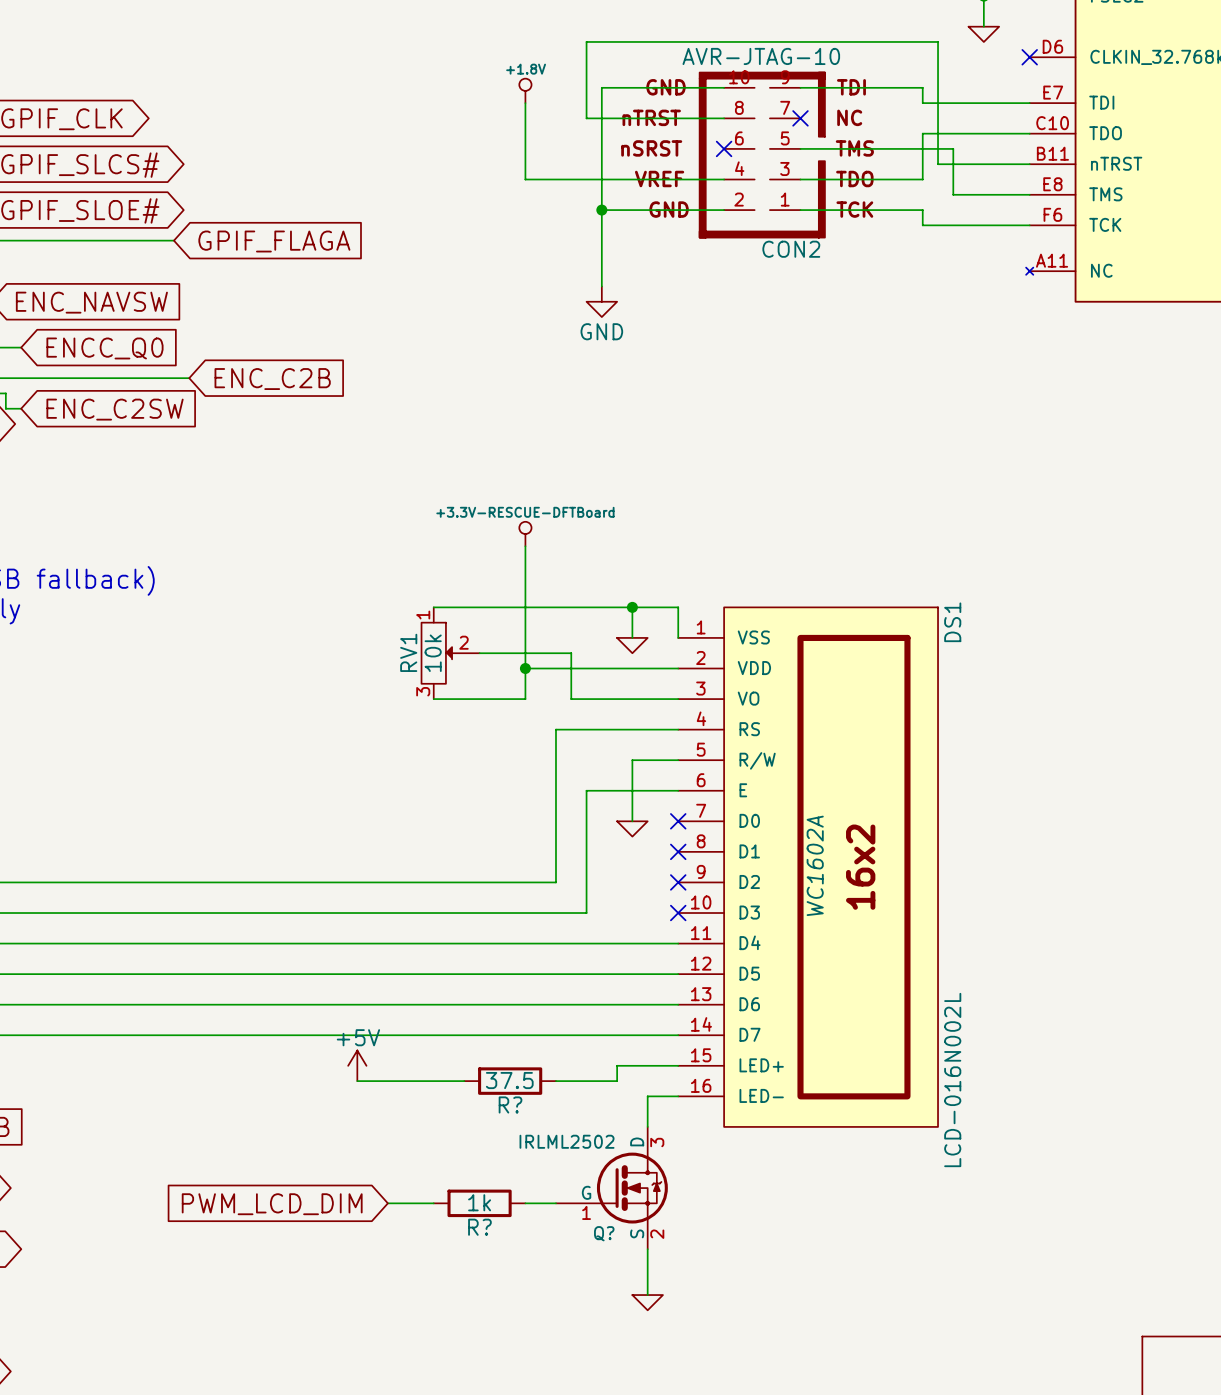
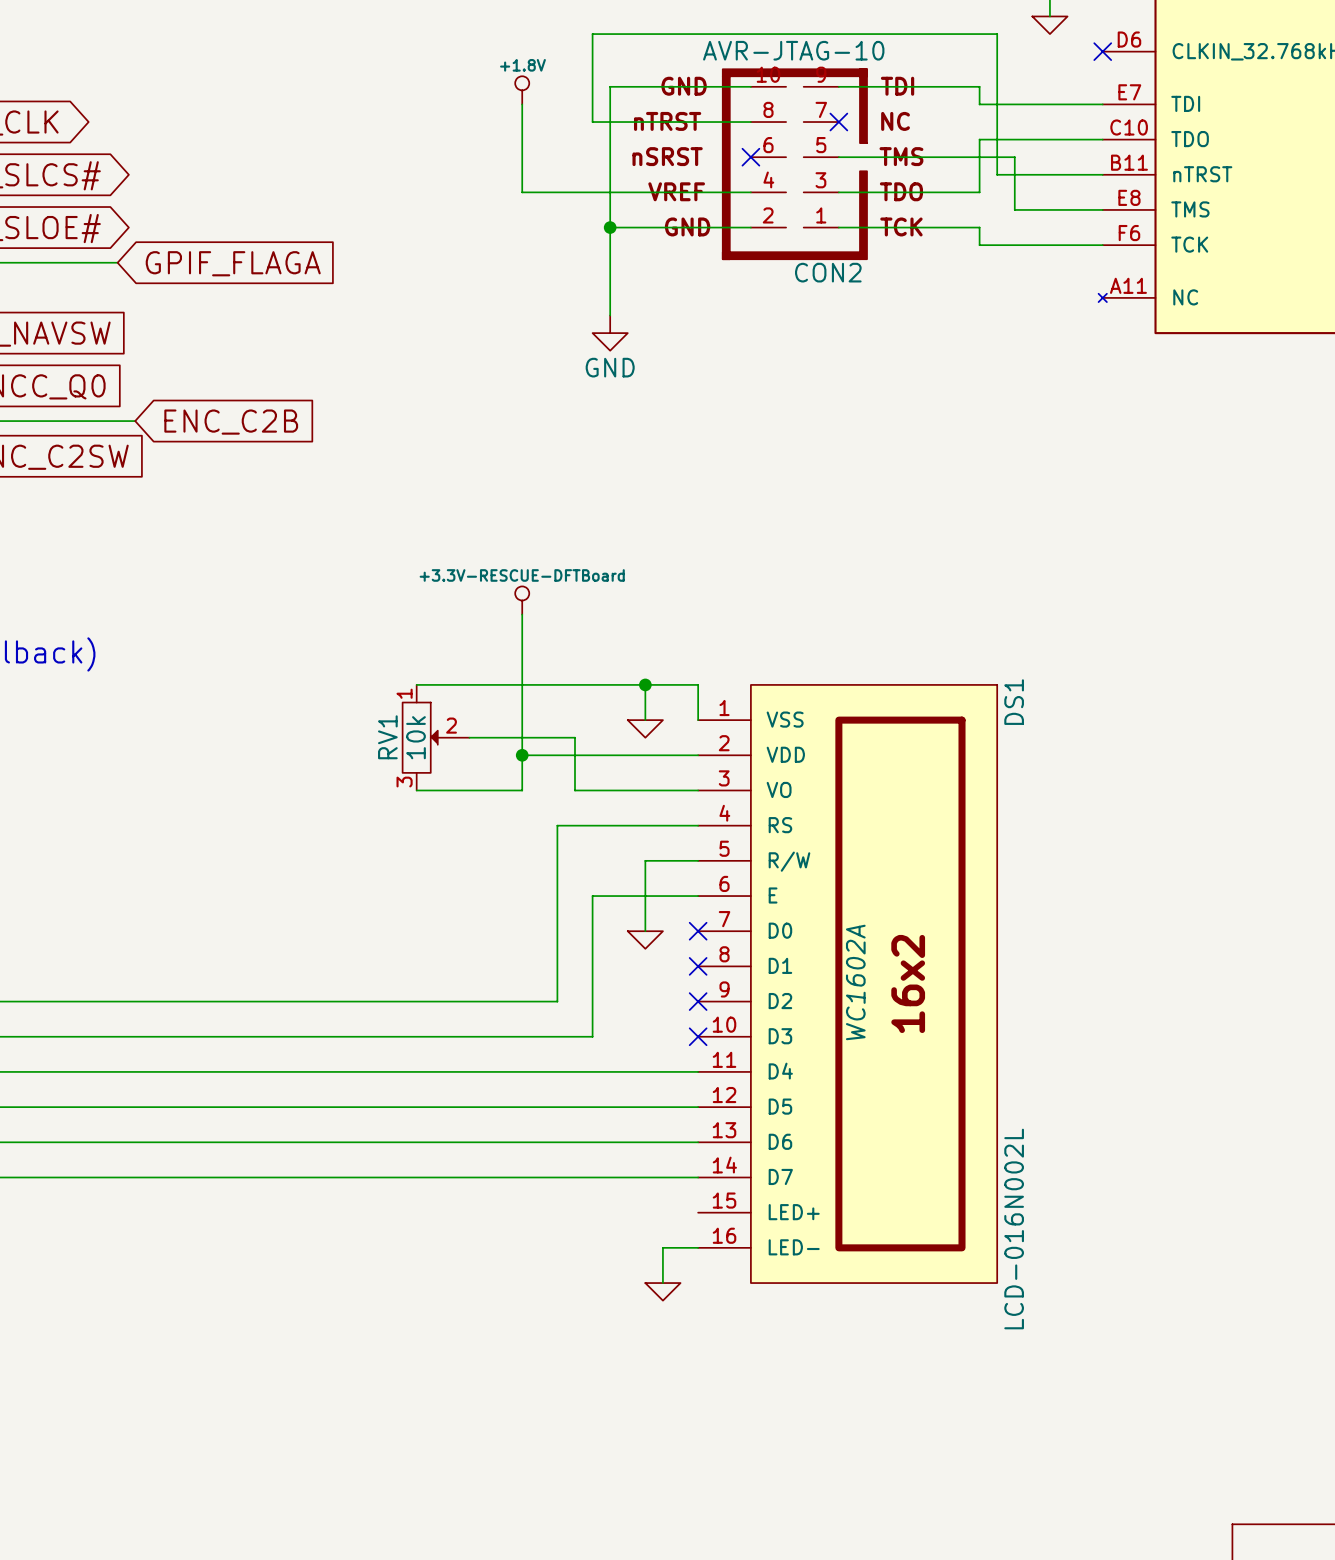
power symbol: +5V (357, 1065) -> none
wire: (678, 1065) (617, 1065) (617, 1081) (555, 1081) -> none
wire: (357, 1081) (464, 1081) -> none
R?: 37.5 (510, 1081) -> none
Q?: IRLML2502 (611, 1188) -> none
wire: (387, 1203) (433, 1203) -> none
R?: 1k (479, 1203) -> none
wire: (525, 1203) (555, 1203) -> none
global label: PWM_LCD_DIM (272, 1204) -> none
wire: (647, 1249) (647, 1295) -> none
power symbol position: (647, 1302) -> (662, 1291)

